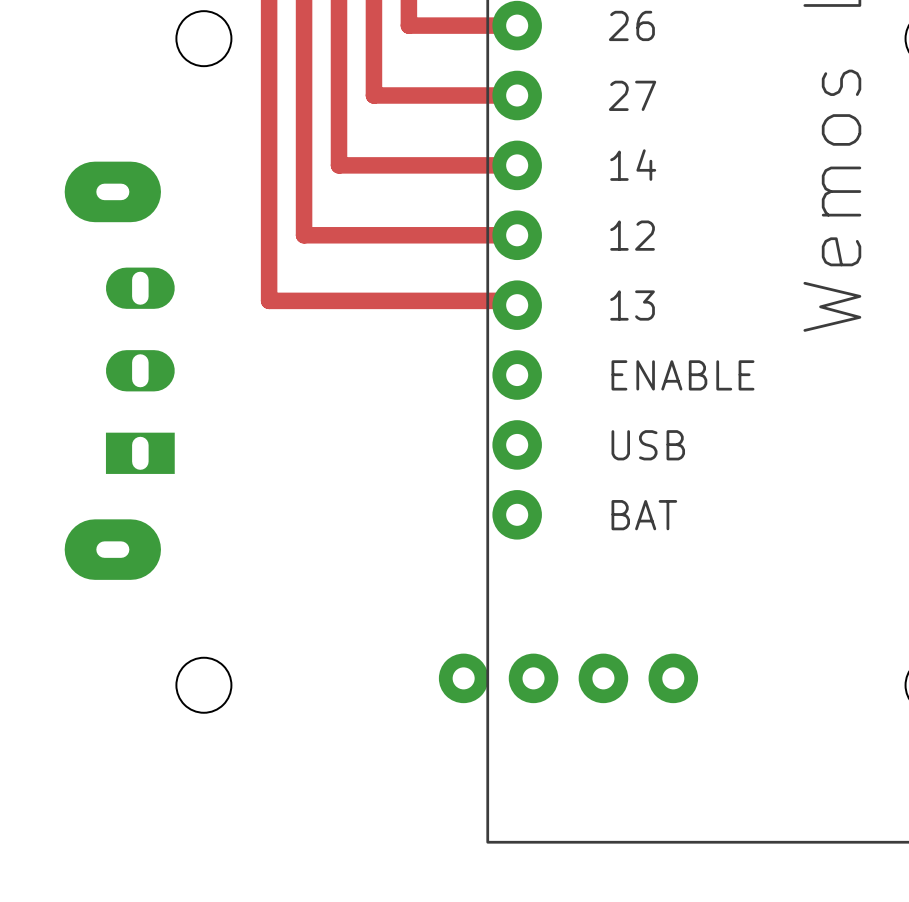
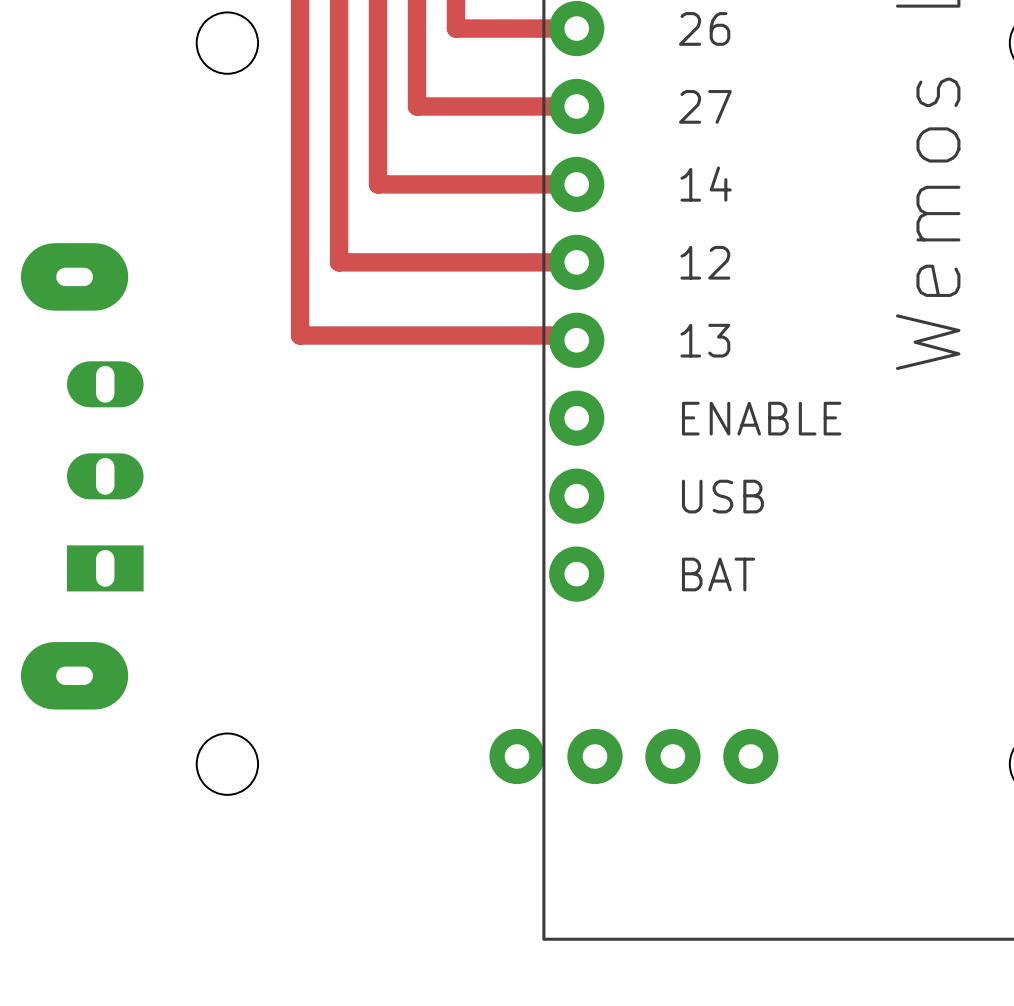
part position: (119, 370) -> (82, 476)

